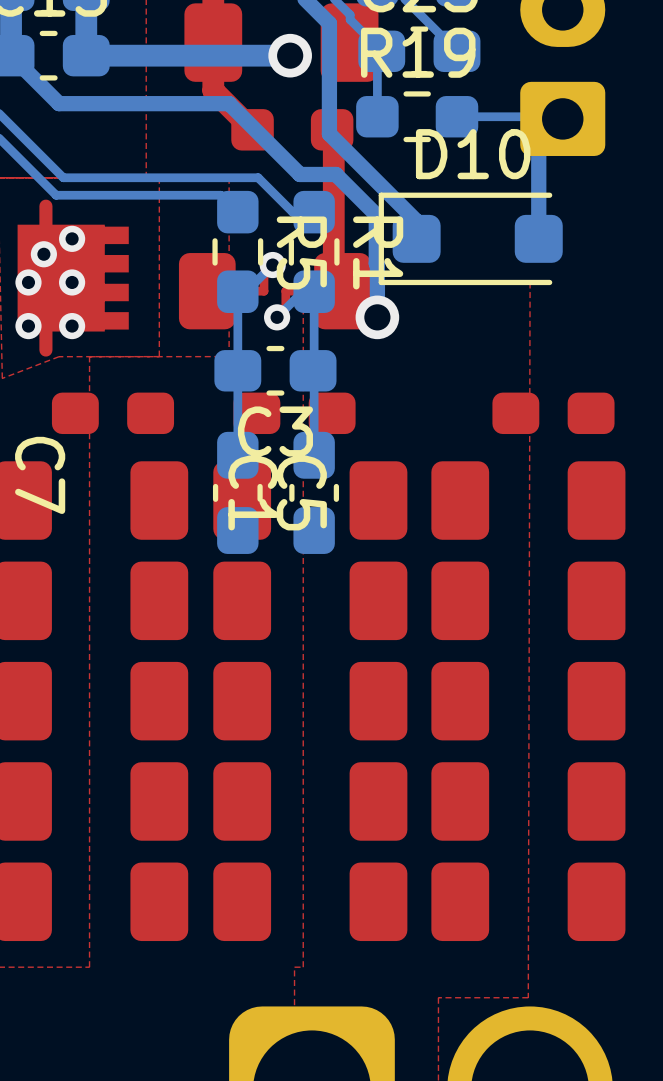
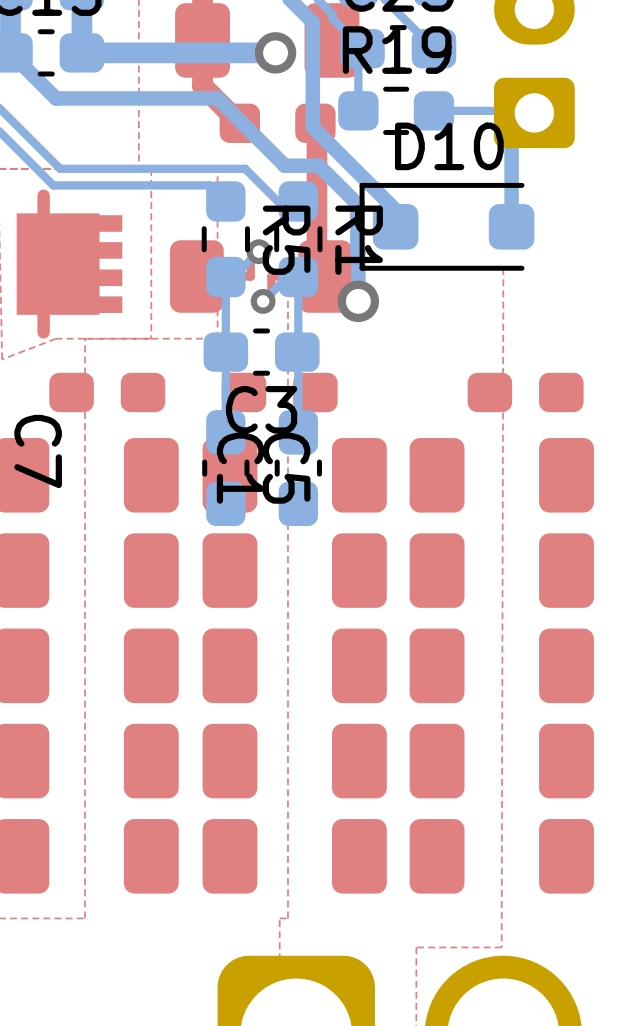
via: (72, 238) -> none
via: (43, 254) -> none
via: (28, 282) -> none
via: (72, 282) -> none
via: (28, 326) -> none
via: (72, 326) -> none

